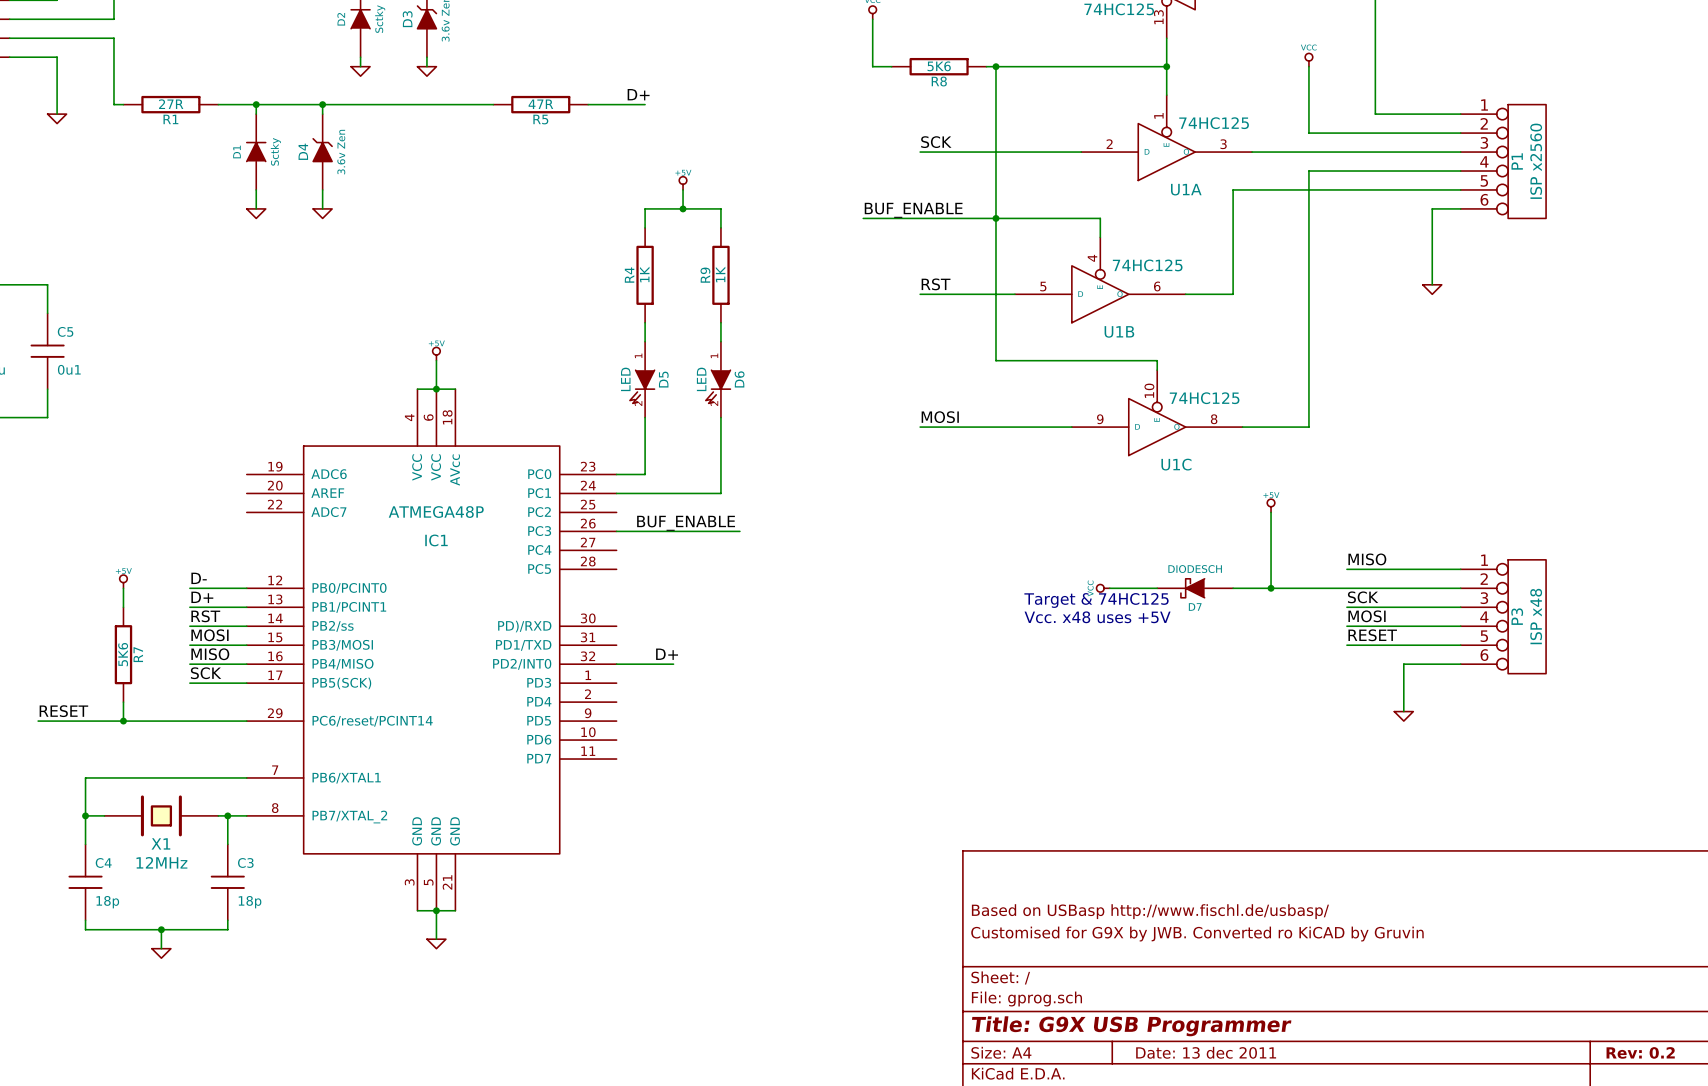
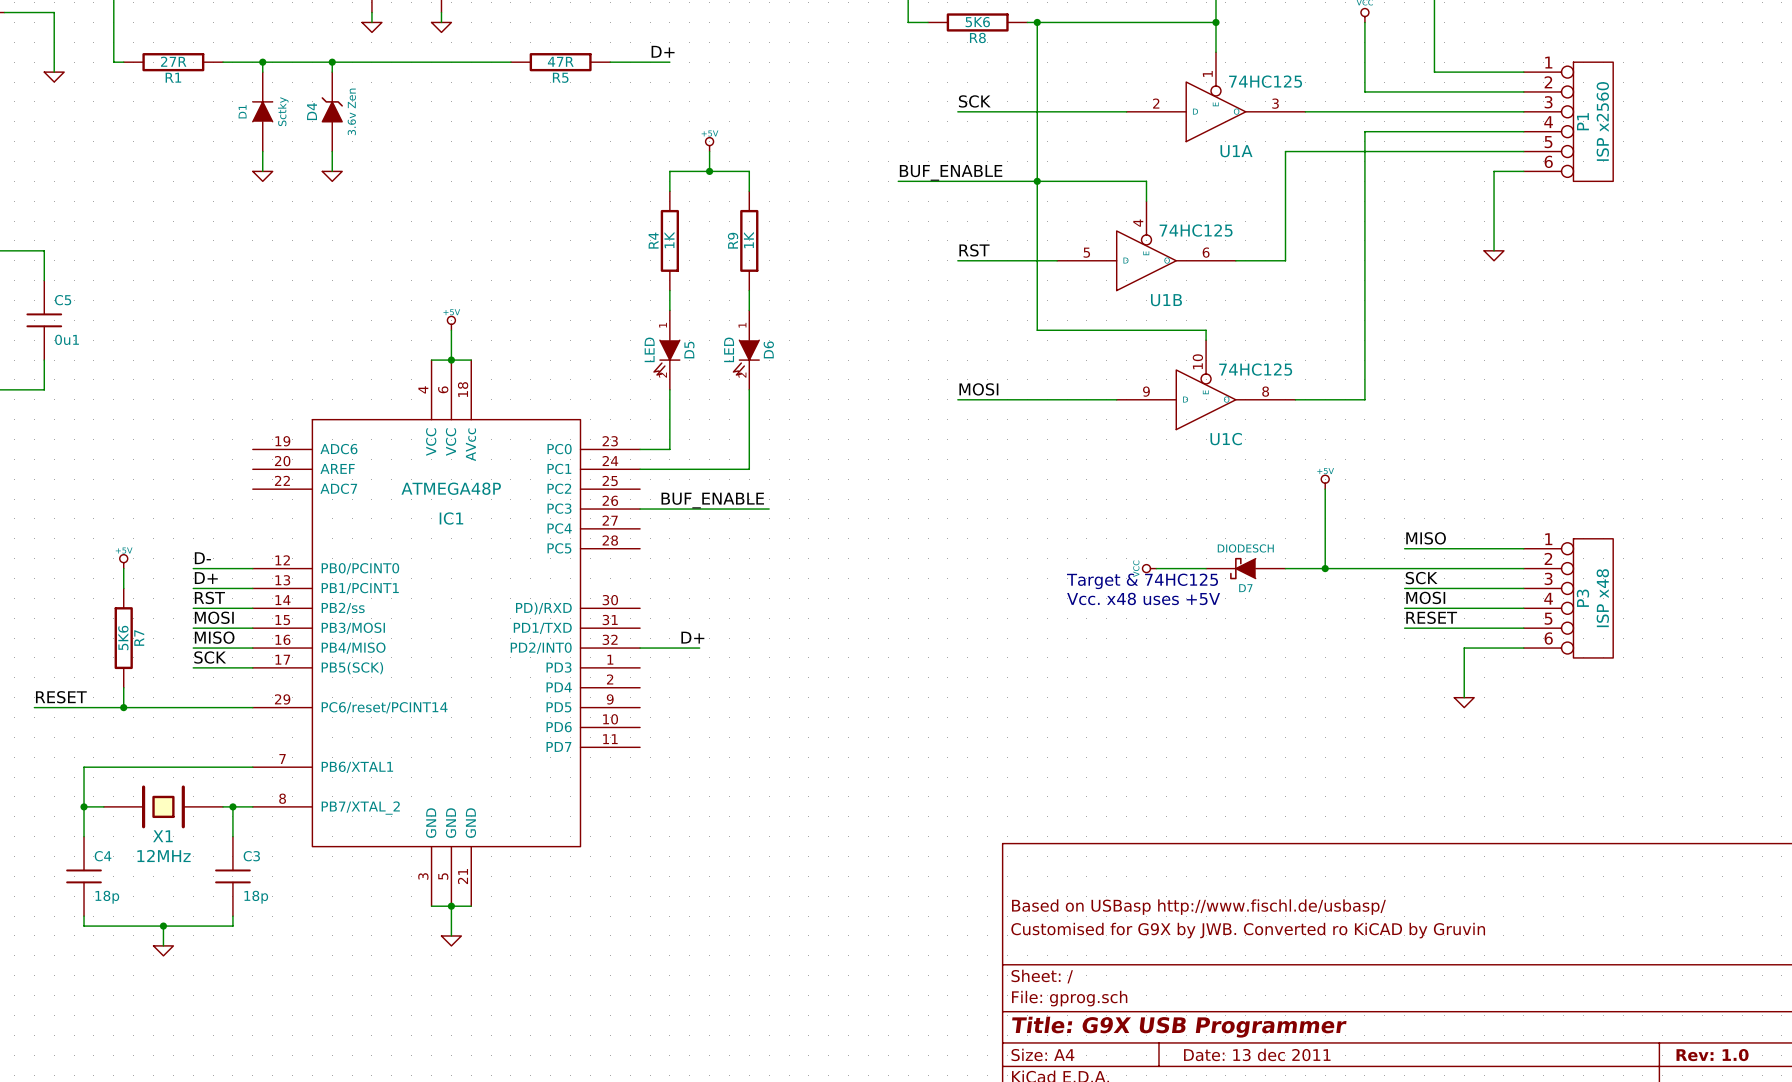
title block: Rev: 0.2 (1640, 1052) -> Rev: 1.0 (1712, 1055)

